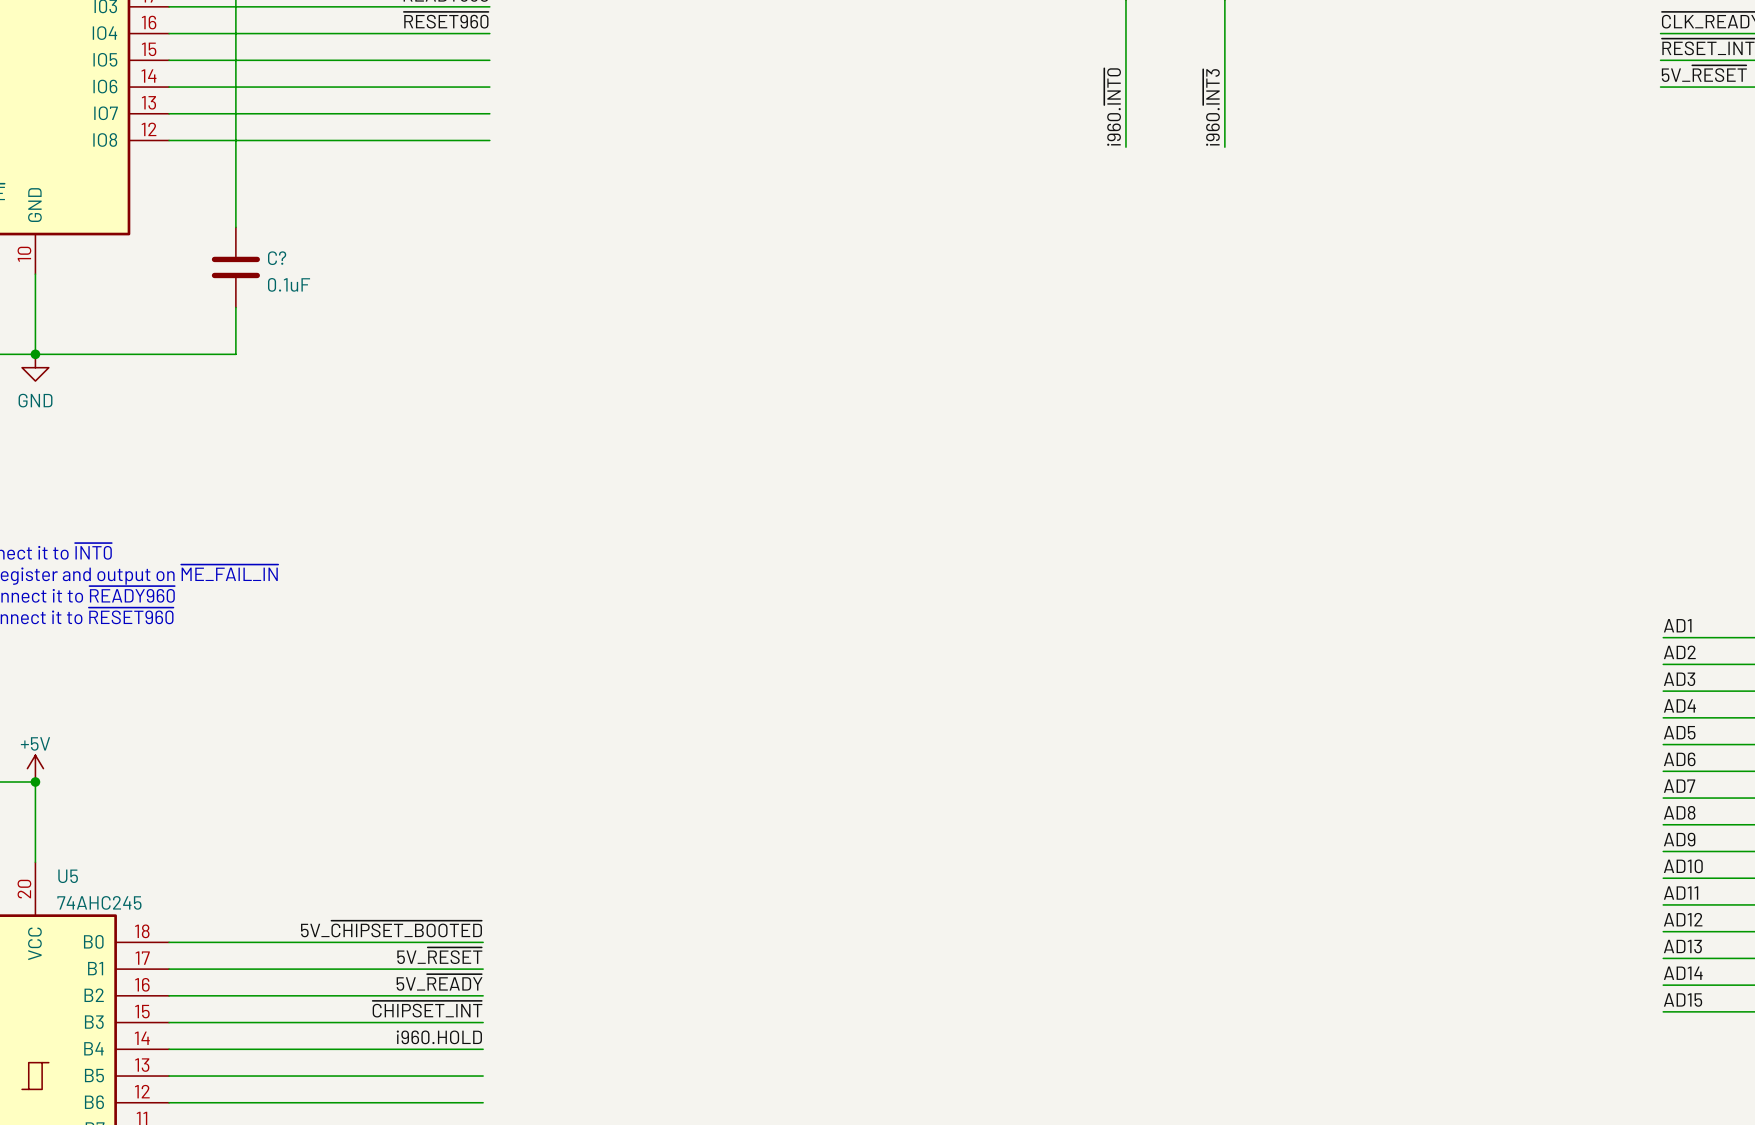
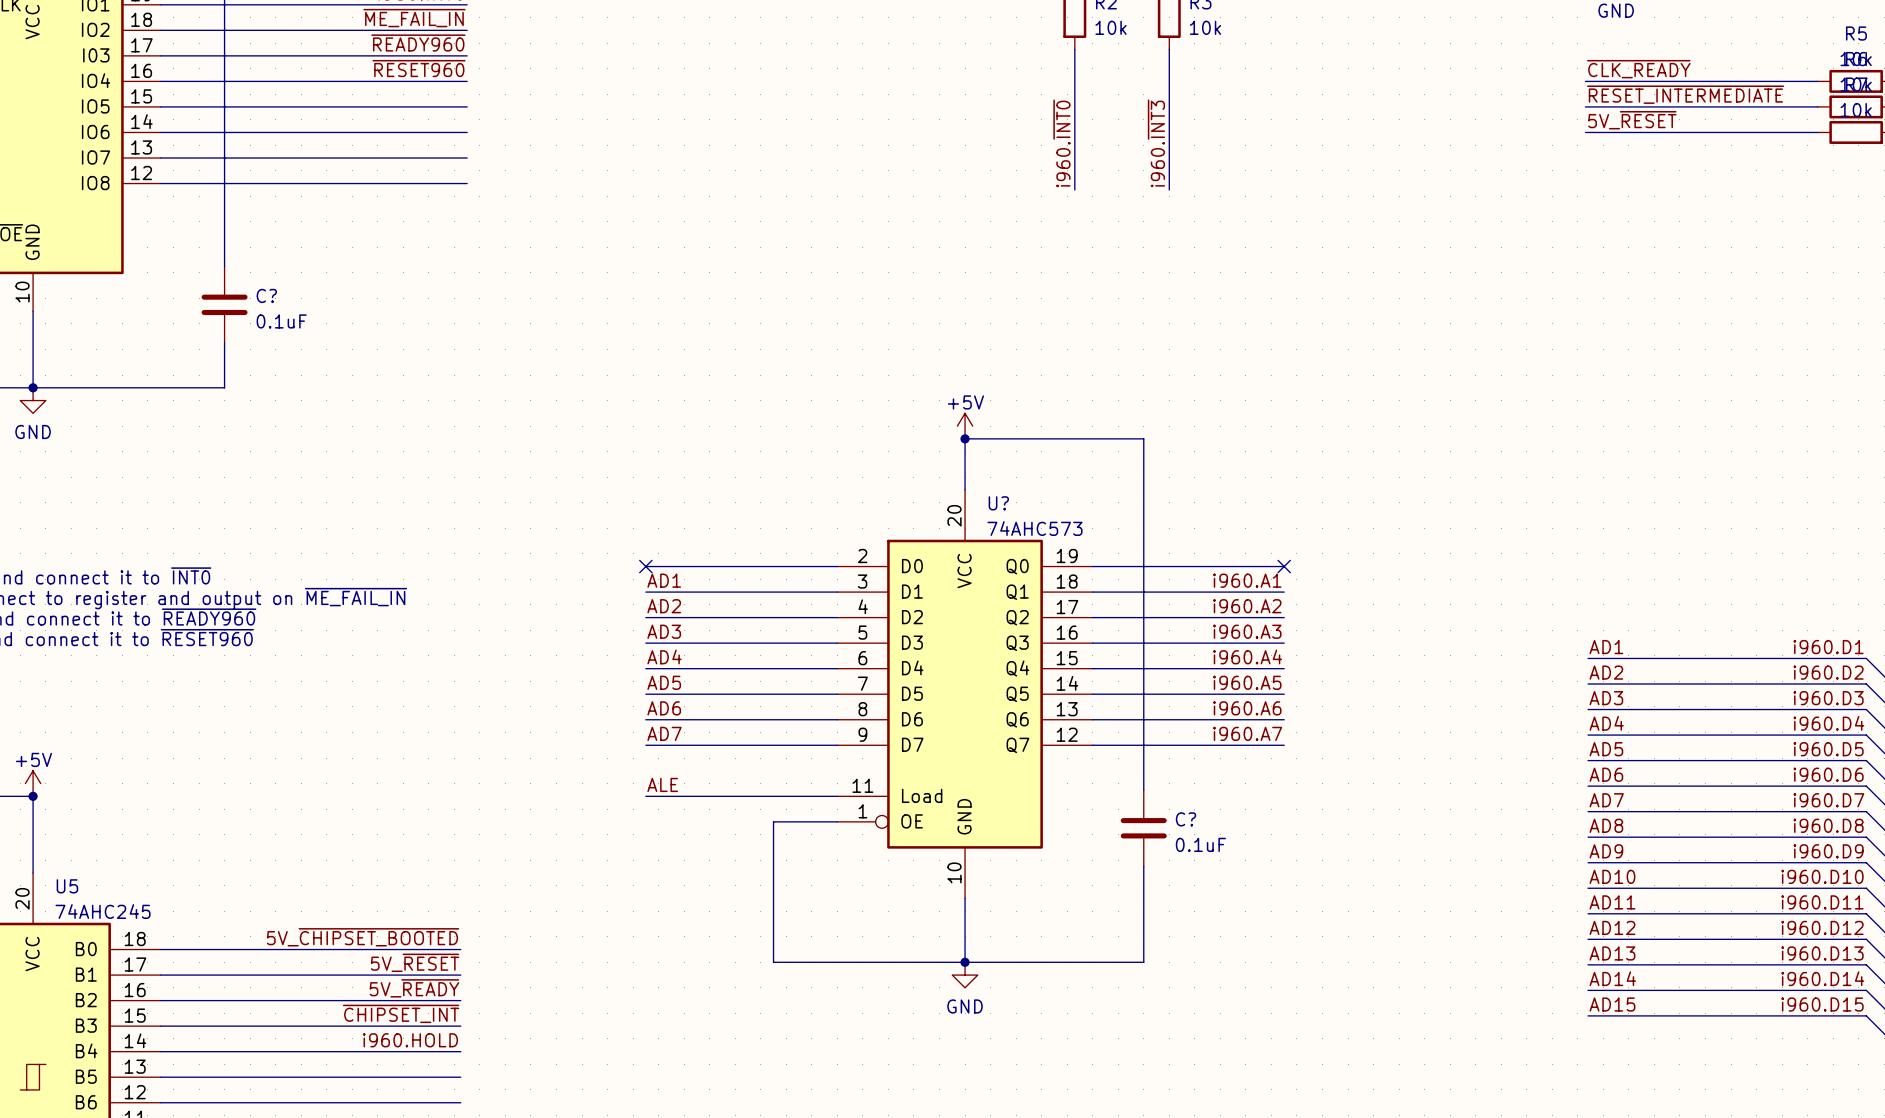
power symbol: none -> +5V (965, 426)
junction: none -> (965, 438)
wire: none -> (965, 489) (965, 438) (1143, 438) (1143, 789)
wire: none -> (645, 566) (837, 566)
no-connect mark: none -> (645, 566)
wire: none -> (1092, 566) (1284, 566)
no-connect mark: none -> (1284, 566)
label: none -> AD1 (664, 580)
label: none -> i960.A1 (1247, 580)
wire: none -> (645, 592) (837, 592)
wire: none -> (1092, 592) (1284, 592)
label: none -> AD2 (664, 606)
label: none -> i960.A2 (1247, 606)
wire: none -> (645, 617) (837, 617)
wire: none -> (1092, 617) (1284, 617)
label: none -> AD3 (664, 631)
label: none -> i960.A3 (1247, 631)
wire: none -> (645, 643) (837, 643)
wire: none -> (1092, 643) (1284, 643)
label: none -> AD4 (664, 656)
label: none -> i960.A4 (1247, 656)
wire: none -> (645, 668) (837, 668)
wire: none -> (1092, 668) (1284, 668)
label: none -> AD5 (664, 682)
label: none -> i960.A5 (1247, 682)
wire: none -> (645, 694) (837, 694)
U?: none -> 74AHC573 (965, 694)
wire: none -> (1092, 694) (1284, 694)
label: none -> AD6 (664, 708)
label: none -> i960.A6 (1247, 708)
wire: none -> (645, 719) (837, 719)
wire: none -> (1092, 719) (1284, 719)
label: none -> AD7 (664, 733)
label: none -> i960.A7 (1247, 733)
wire: none -> (645, 745) (837, 745)
wire: none -> (1092, 745) (1284, 745)
label: none -> ALE (662, 784)
wire: none -> (645, 796) (837, 796)
wire: none -> (837, 821) (773, 821) (773, 962) (1143, 962) (1143, 866)
C?: none -> 0.1uF (1143, 828)
wire: none -> (965, 898) (965, 962)
junction: none -> (965, 962)
power symbol: none -> GND (965, 975)

